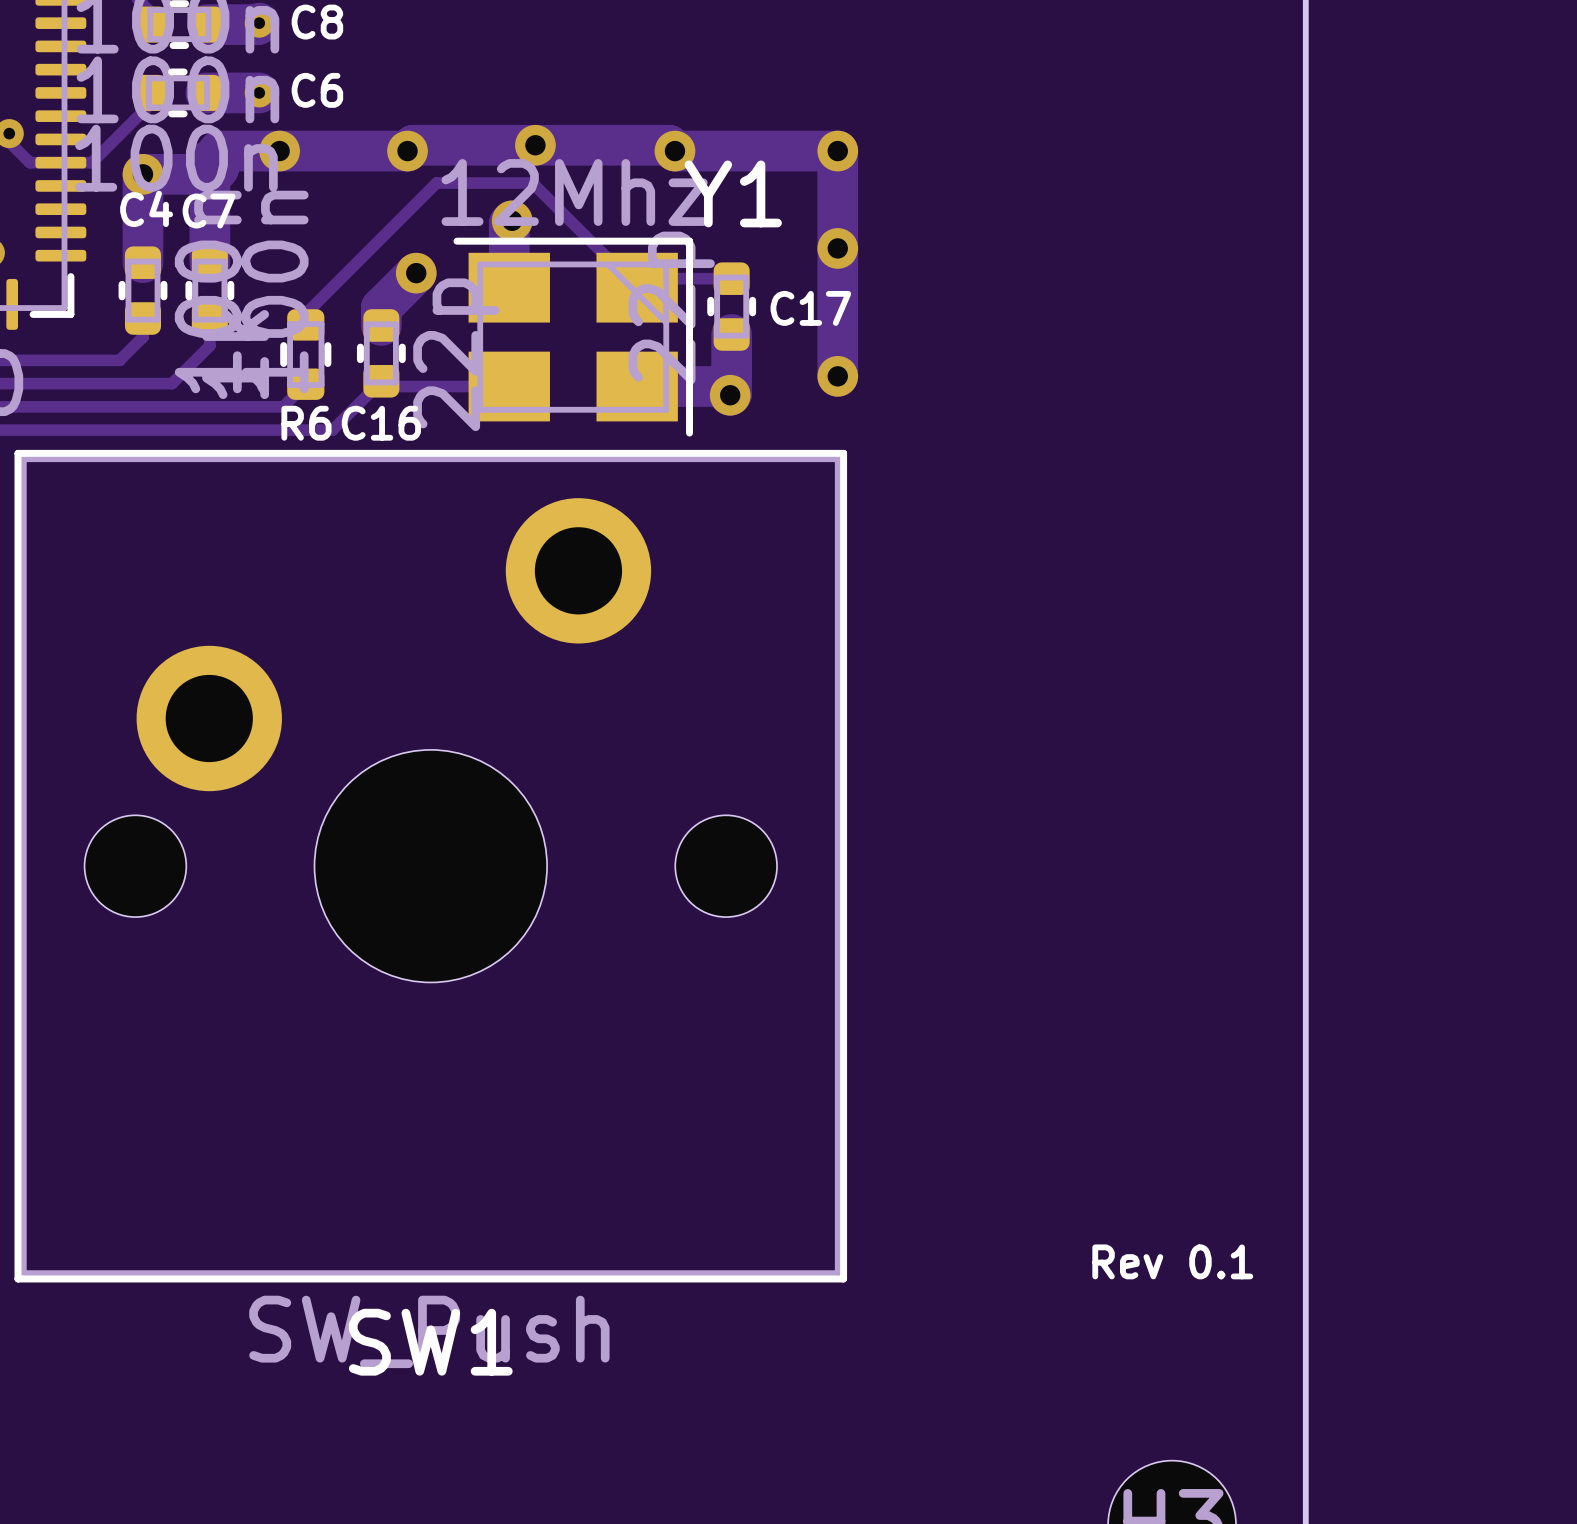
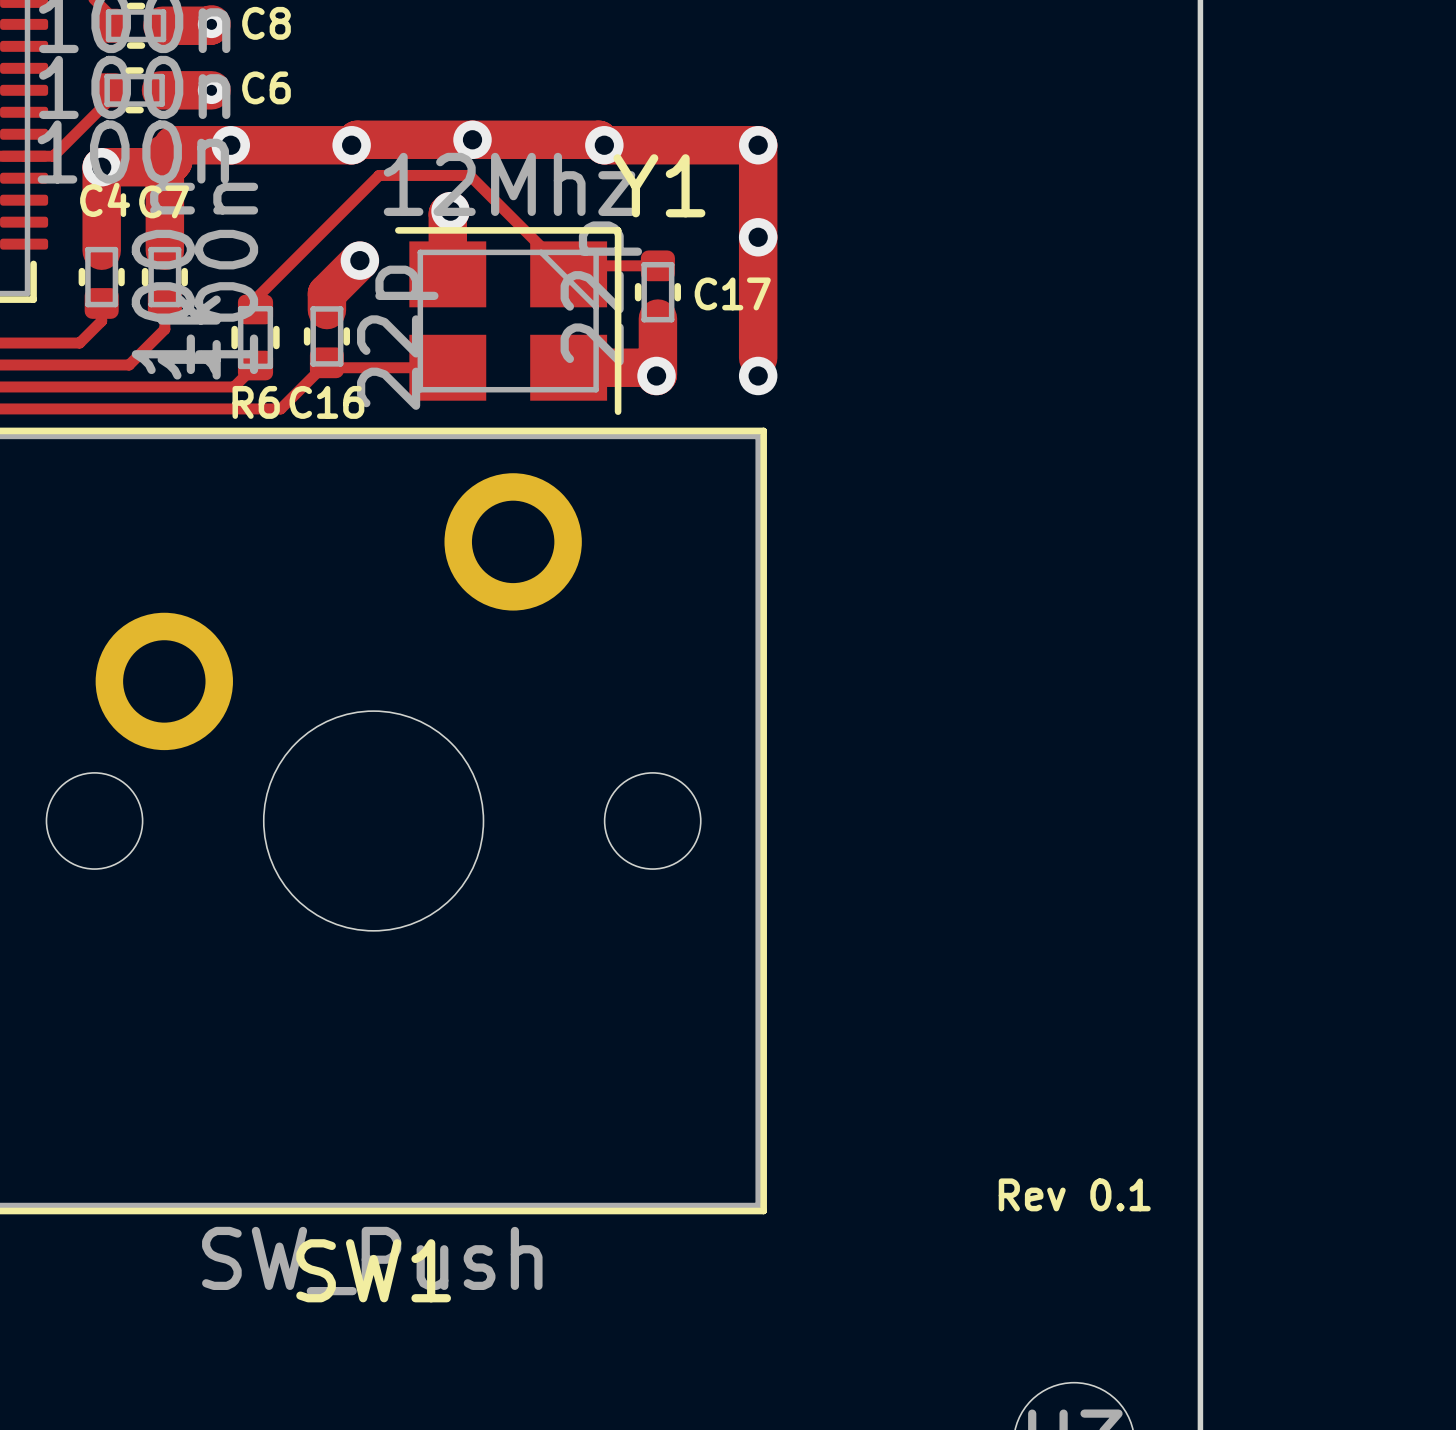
via position: (837, 376) -> (758, 375)

